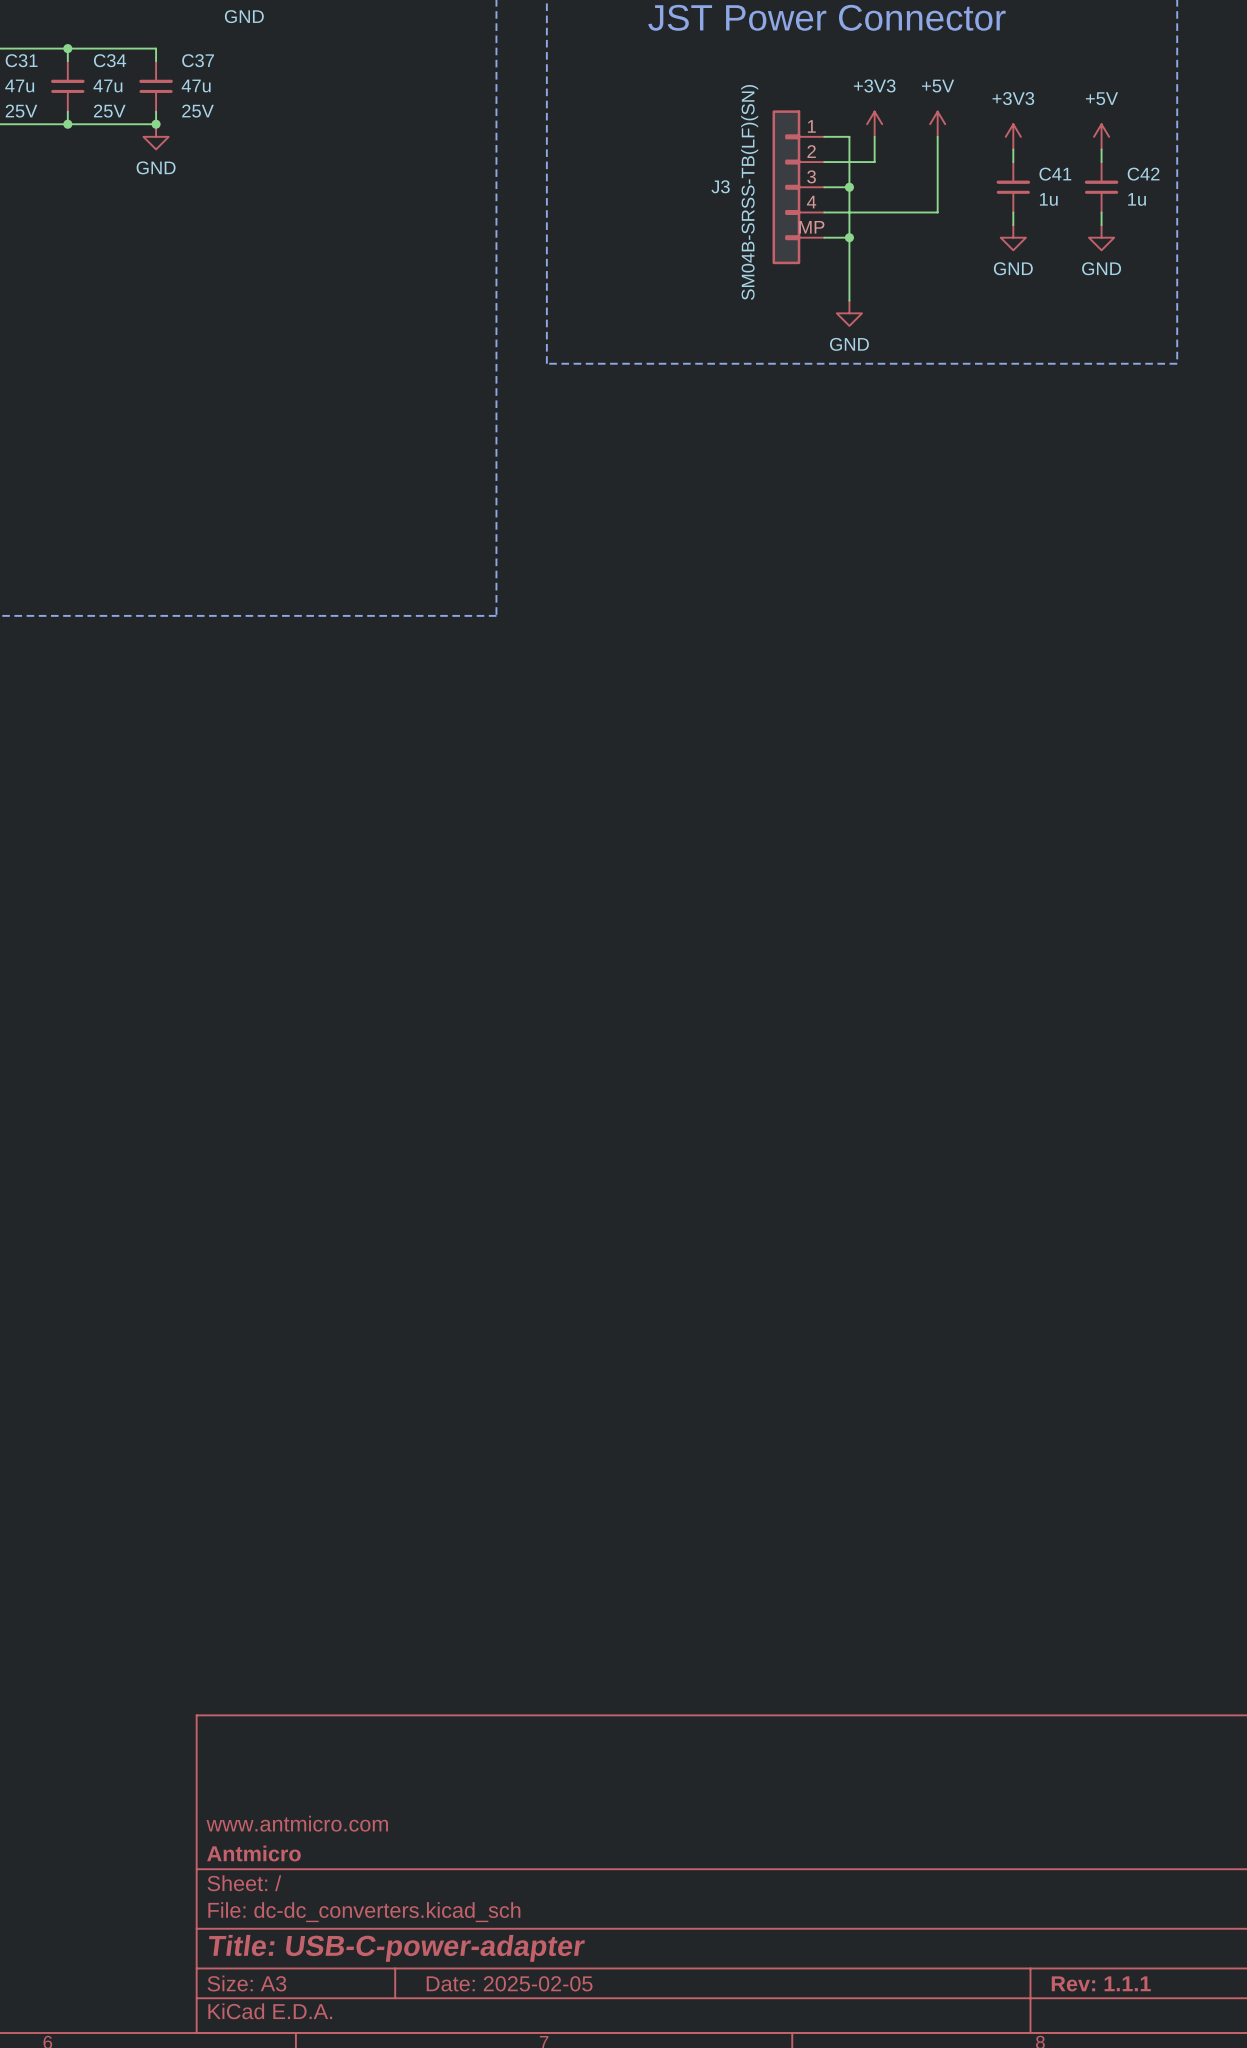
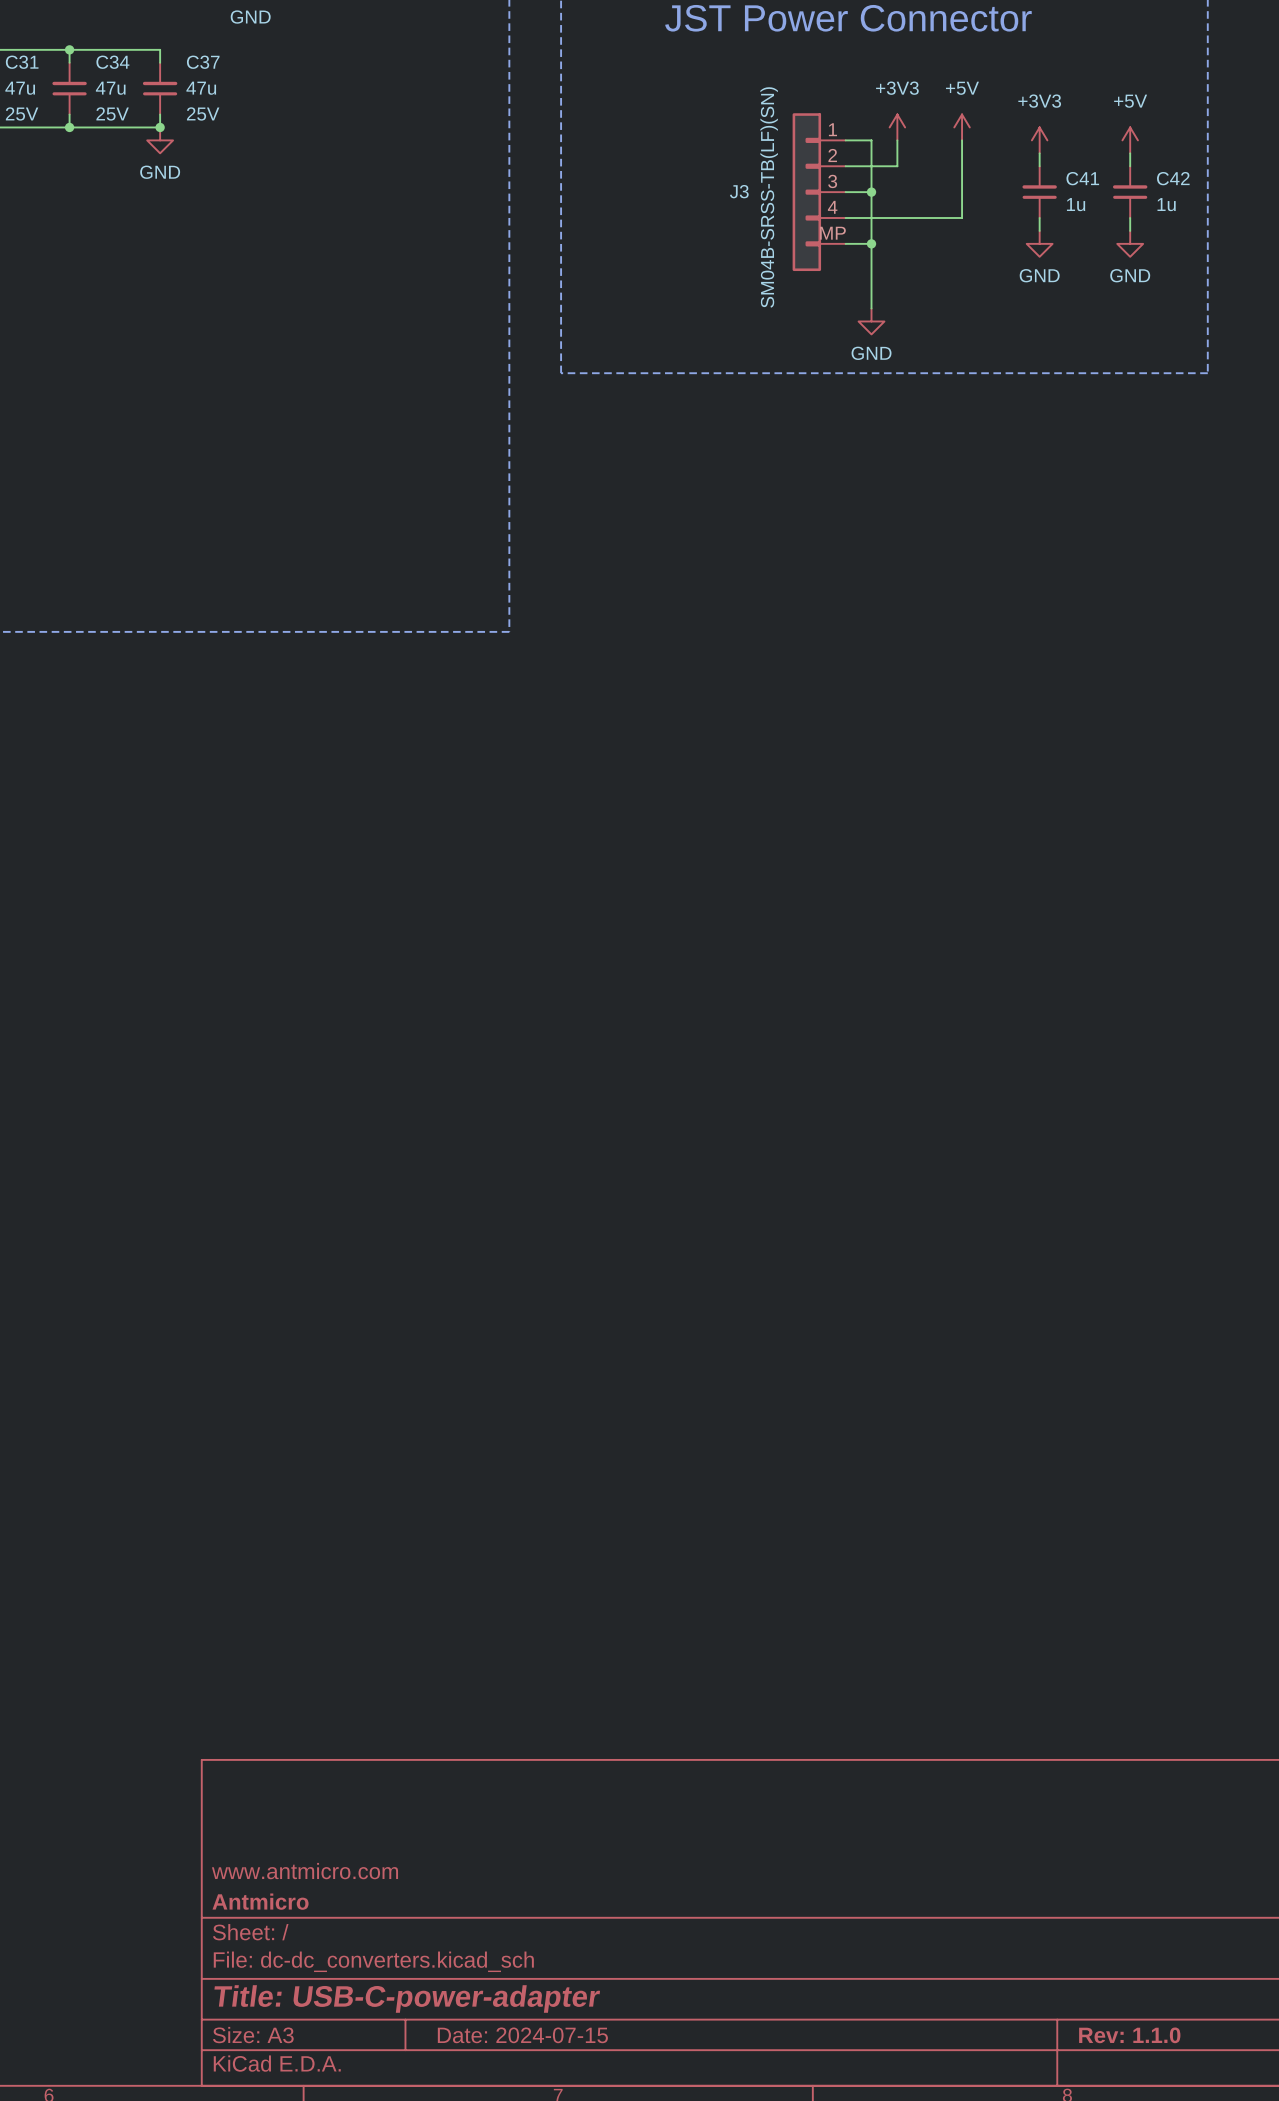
title block: Date: 2025-02-05 (509, 1983) -> Date: 2024-07-15 (522, 2035)
title block: Rev: 1.1.1 (1101, 1983) -> Rev: 1.1.0 (1129, 2035)

